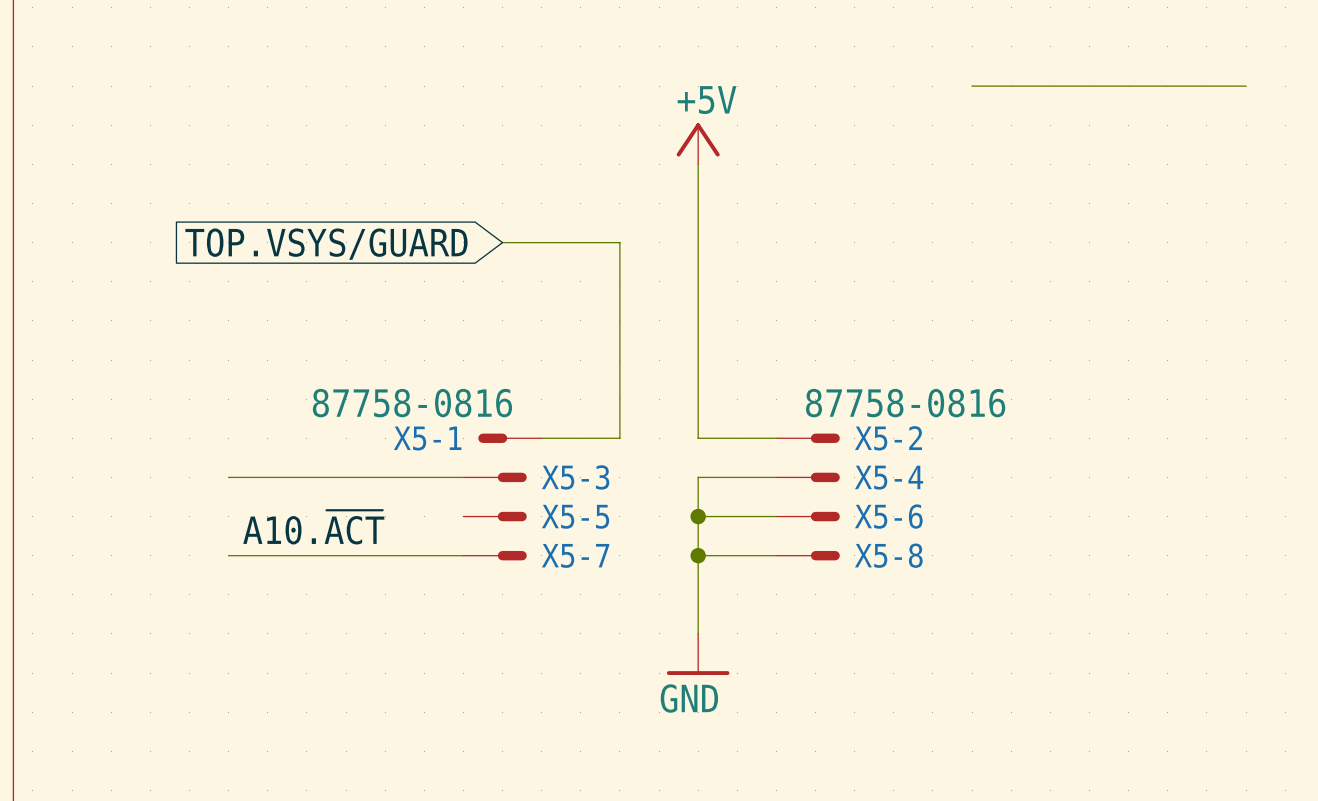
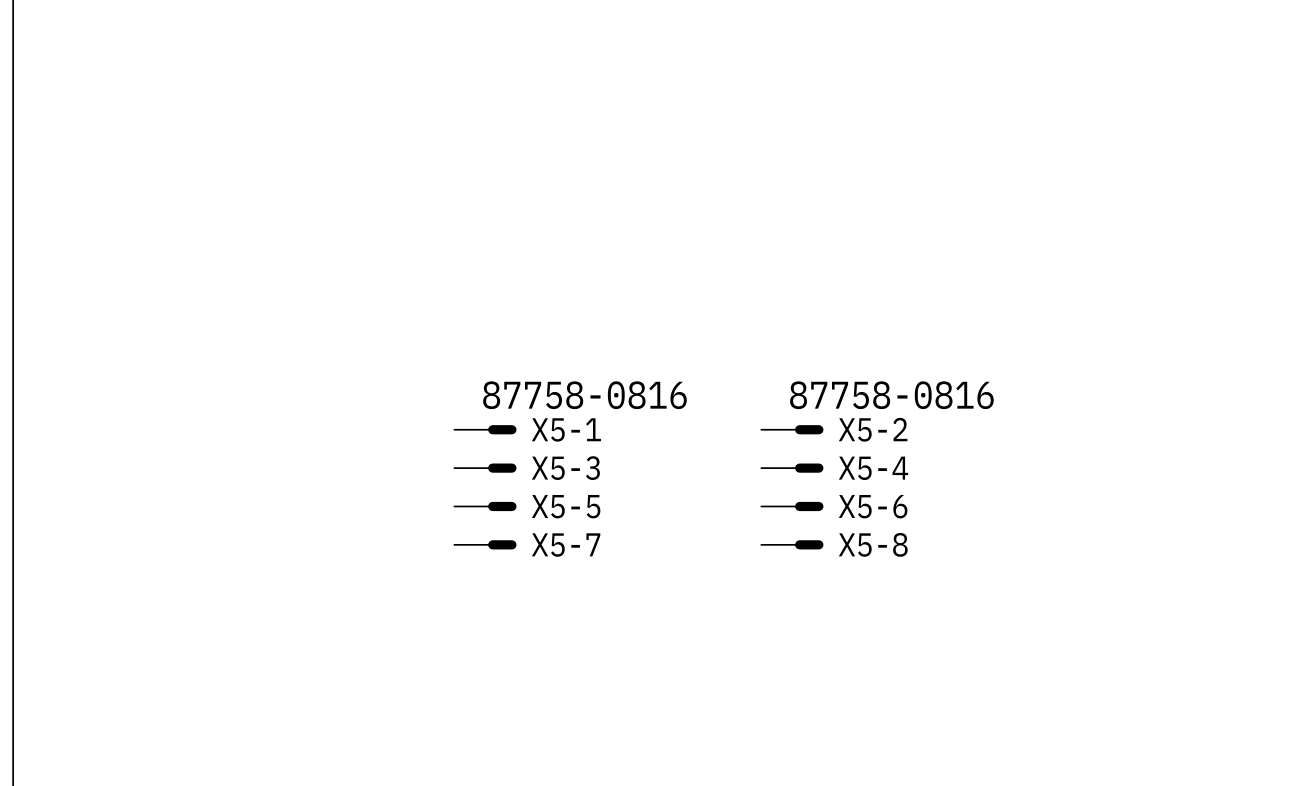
wire: (972, 86) (1246, 86) -> none
power symbol: +5V (698, 143) -> none
wire: (698, 164) (698, 438) (776, 438) -> none
wire: (502, 242) (619, 242) (619, 438) (541, 438) -> none
global label: TOP.VSYS/GUARD (326, 244) -> none
X5-1 value position: 87758-0816 (412, 403) -> 87758-0816 (584, 395)
X5-1 rotation: 0° (492, 438) -> 180° (502, 429)
wire: (228, 477) (463, 477) -> none
wire: (776, 477) (698, 477) (698, 633) -> none
wire: (698, 516) (776, 516) -> none
junction: (698, 516) -> none
label: A10.~{ACT} (313, 527) -> none
wire: (228, 555) (463, 555) -> none
wire: (698, 555) (776, 555) -> none
junction: (698, 555) -> none
power symbol: GND (698, 654) -> none

